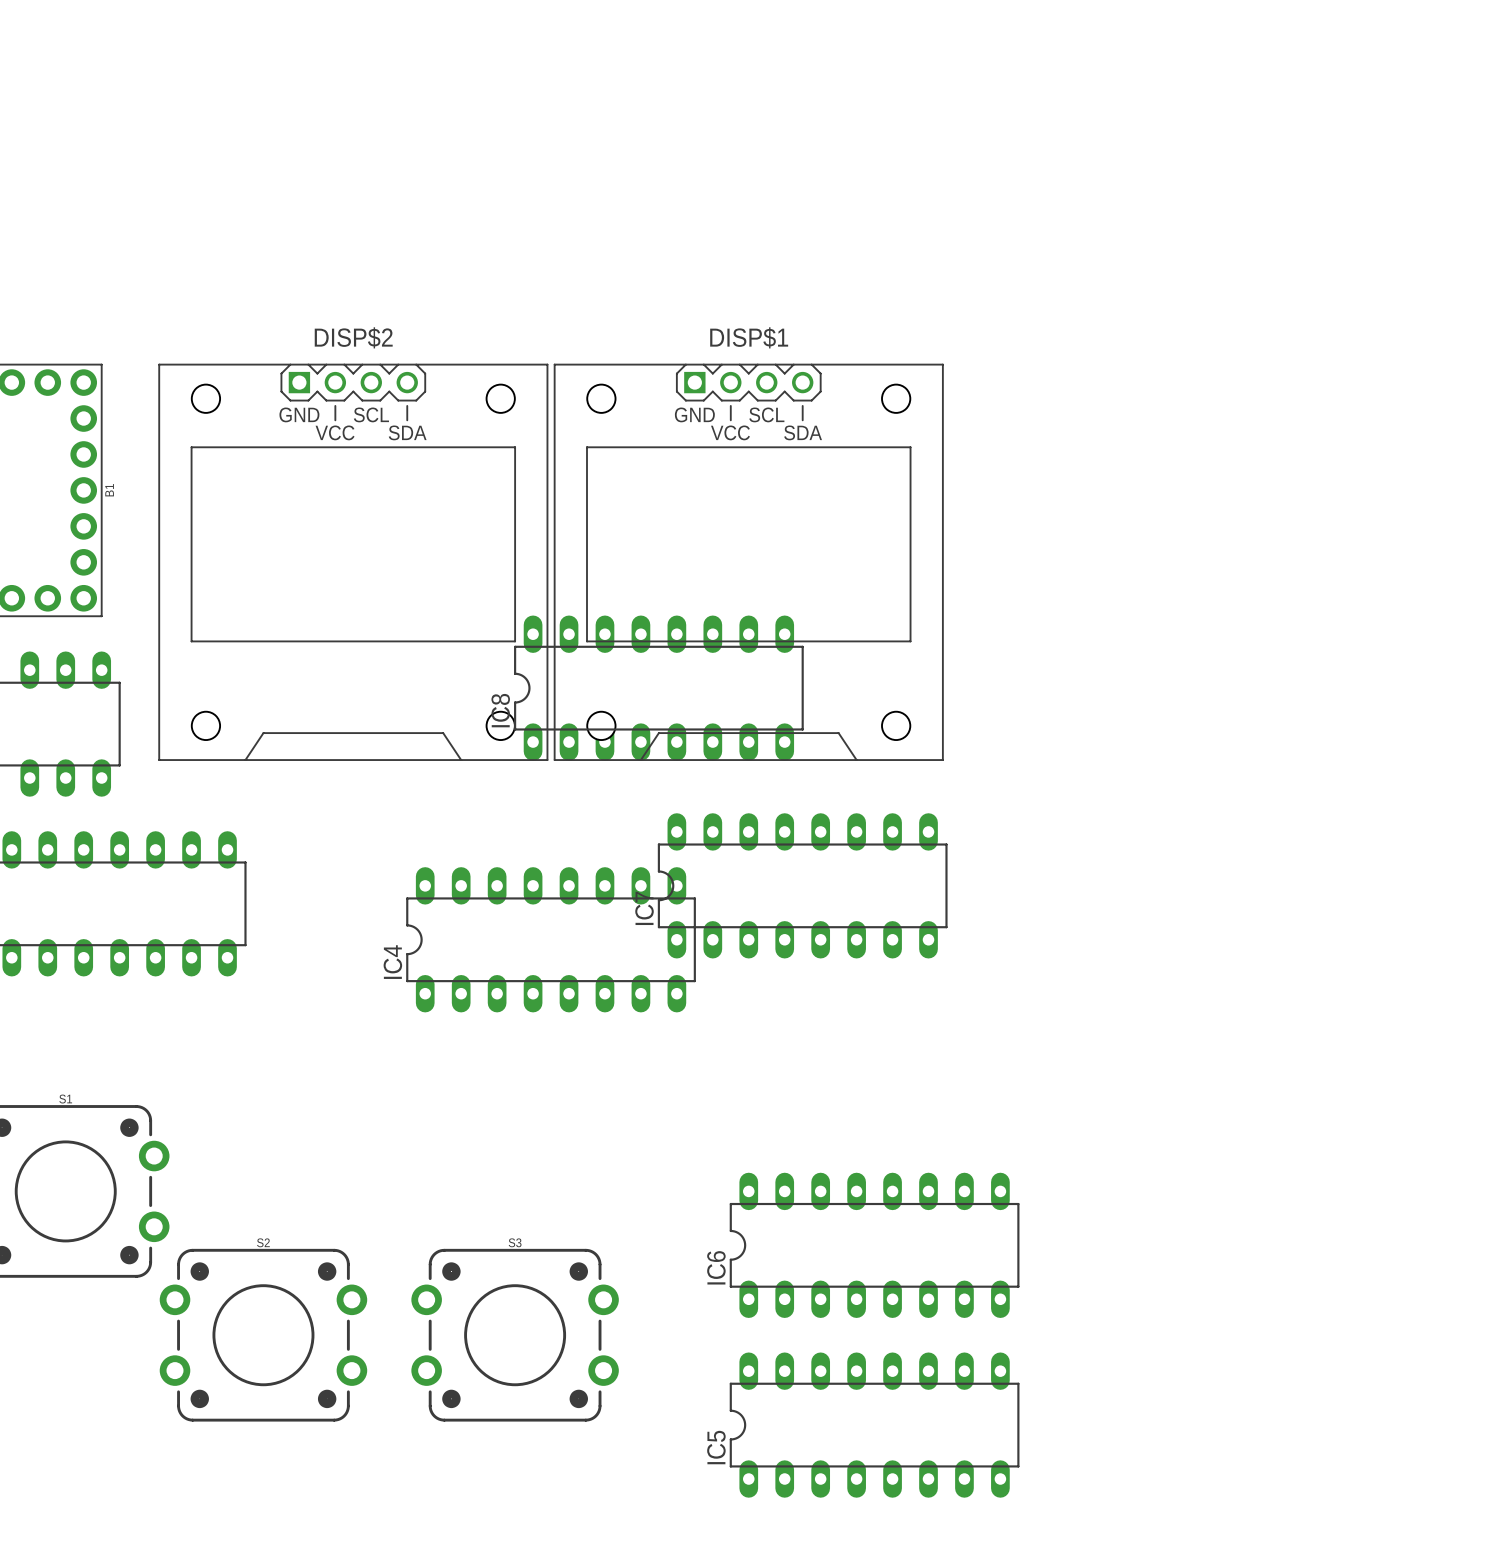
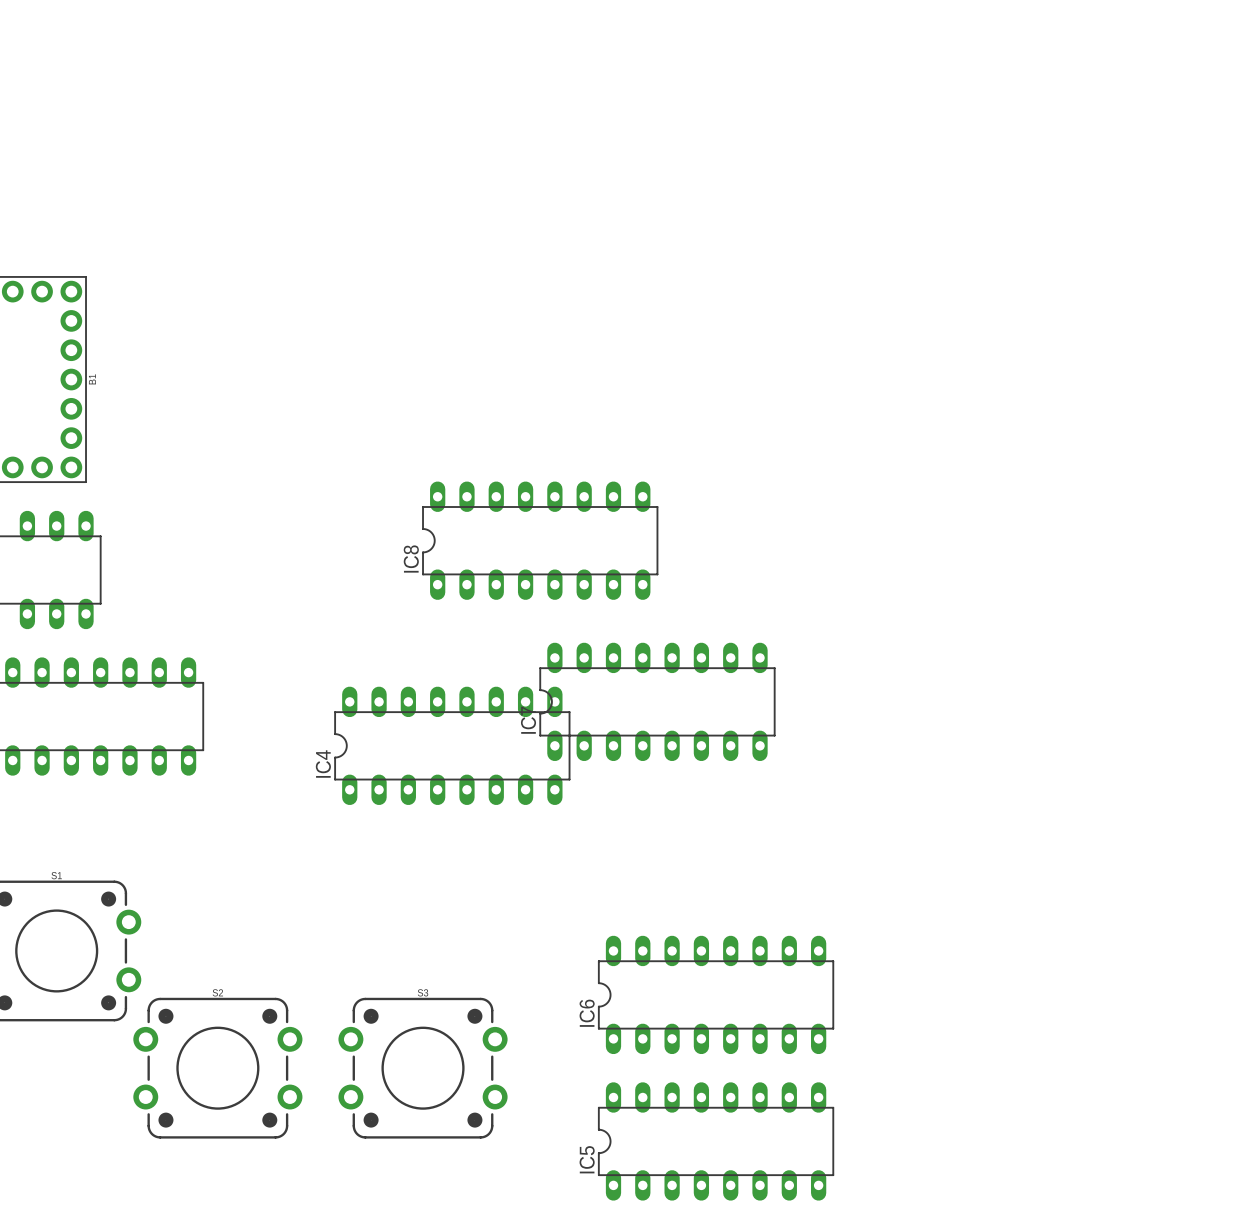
DISP$2: (353, 562) -> none
DISP$1: (748, 562) -> none

